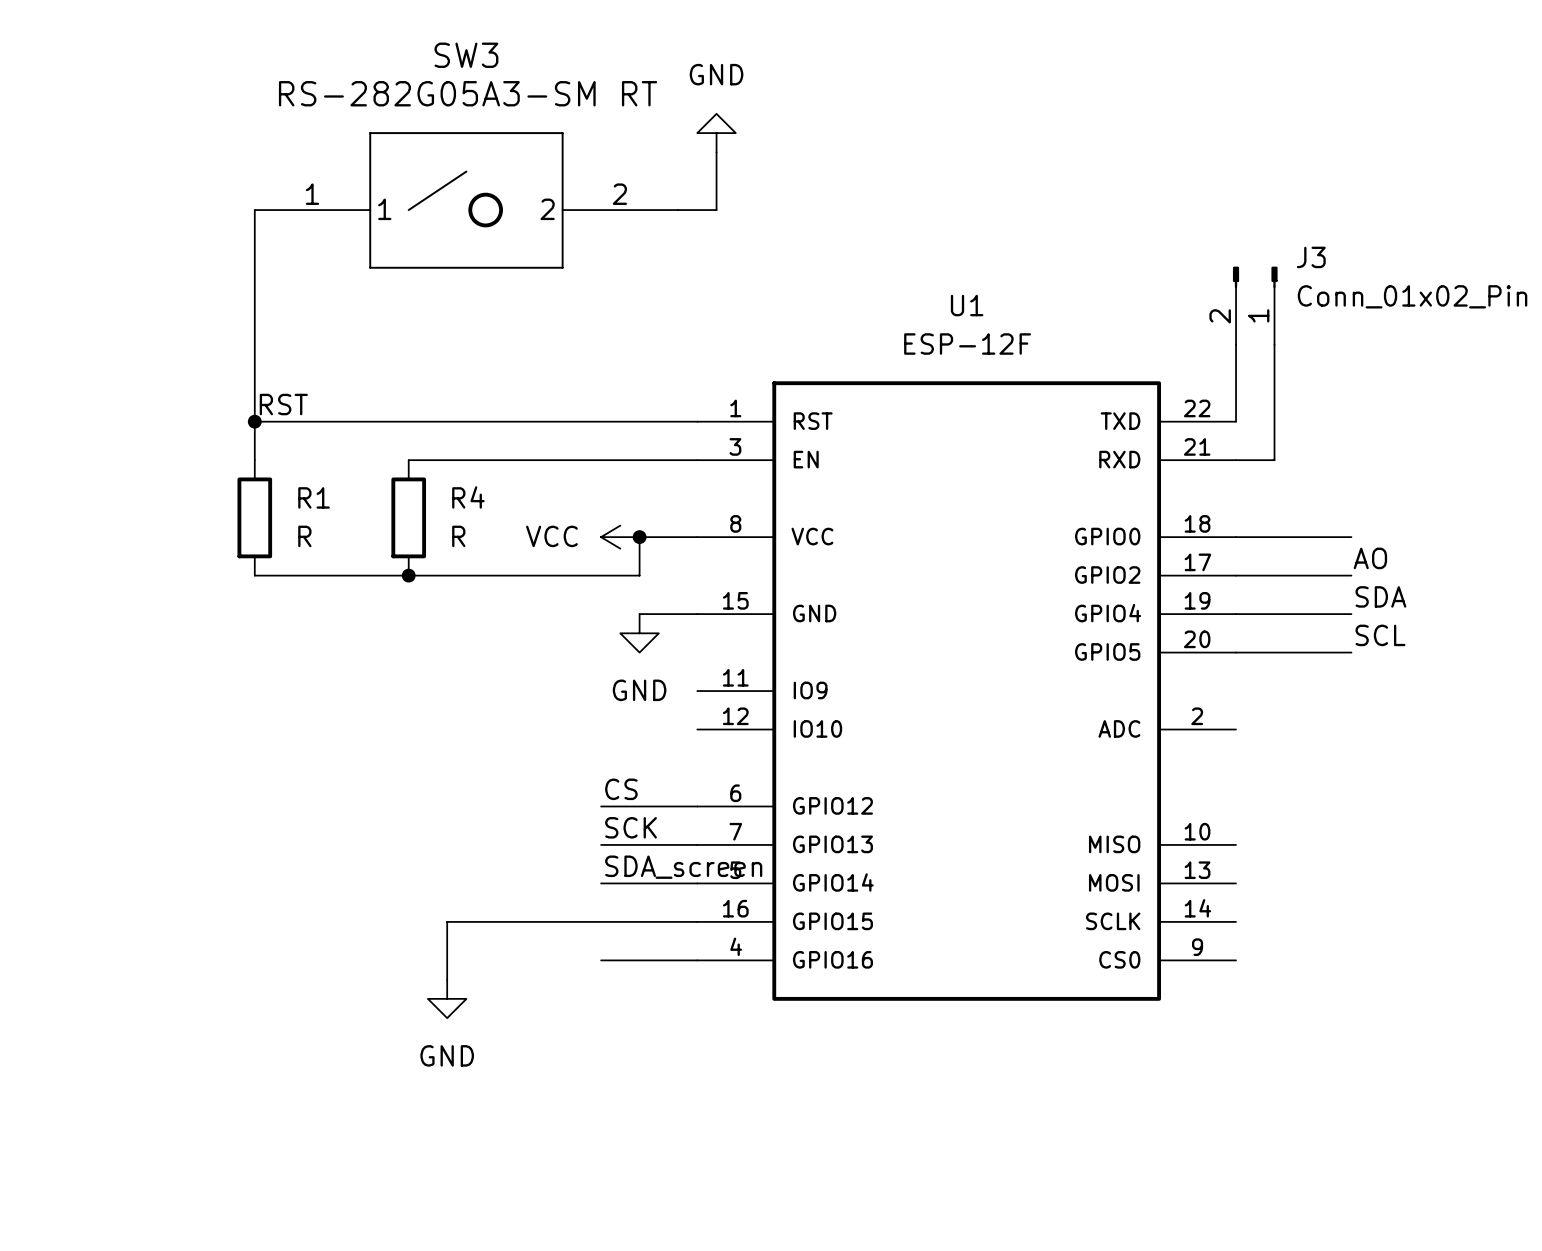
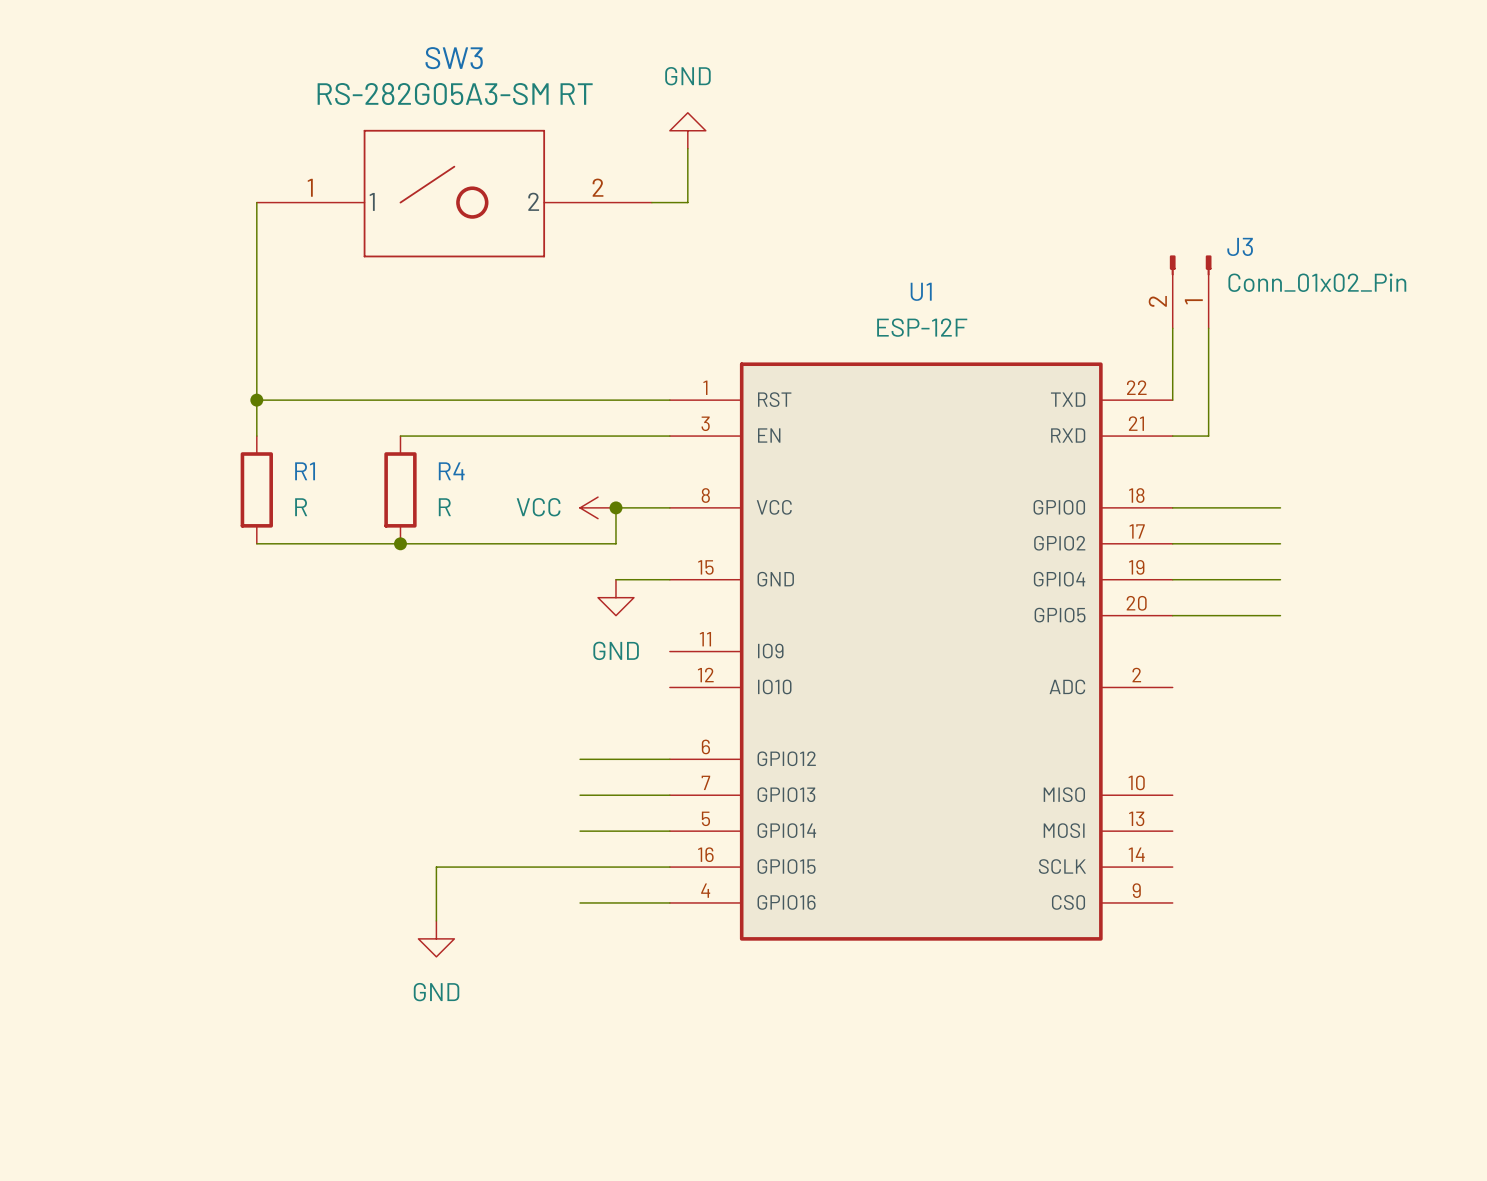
label: RST (283, 404) -> none
label: AO (1370, 558) -> none
label: SDA (1380, 596) -> none
label: SCL (1380, 635) -> none
label: CS (621, 789) -> none
label: SCK (631, 827) -> none
label: SDA_screen (683, 867) -> none

